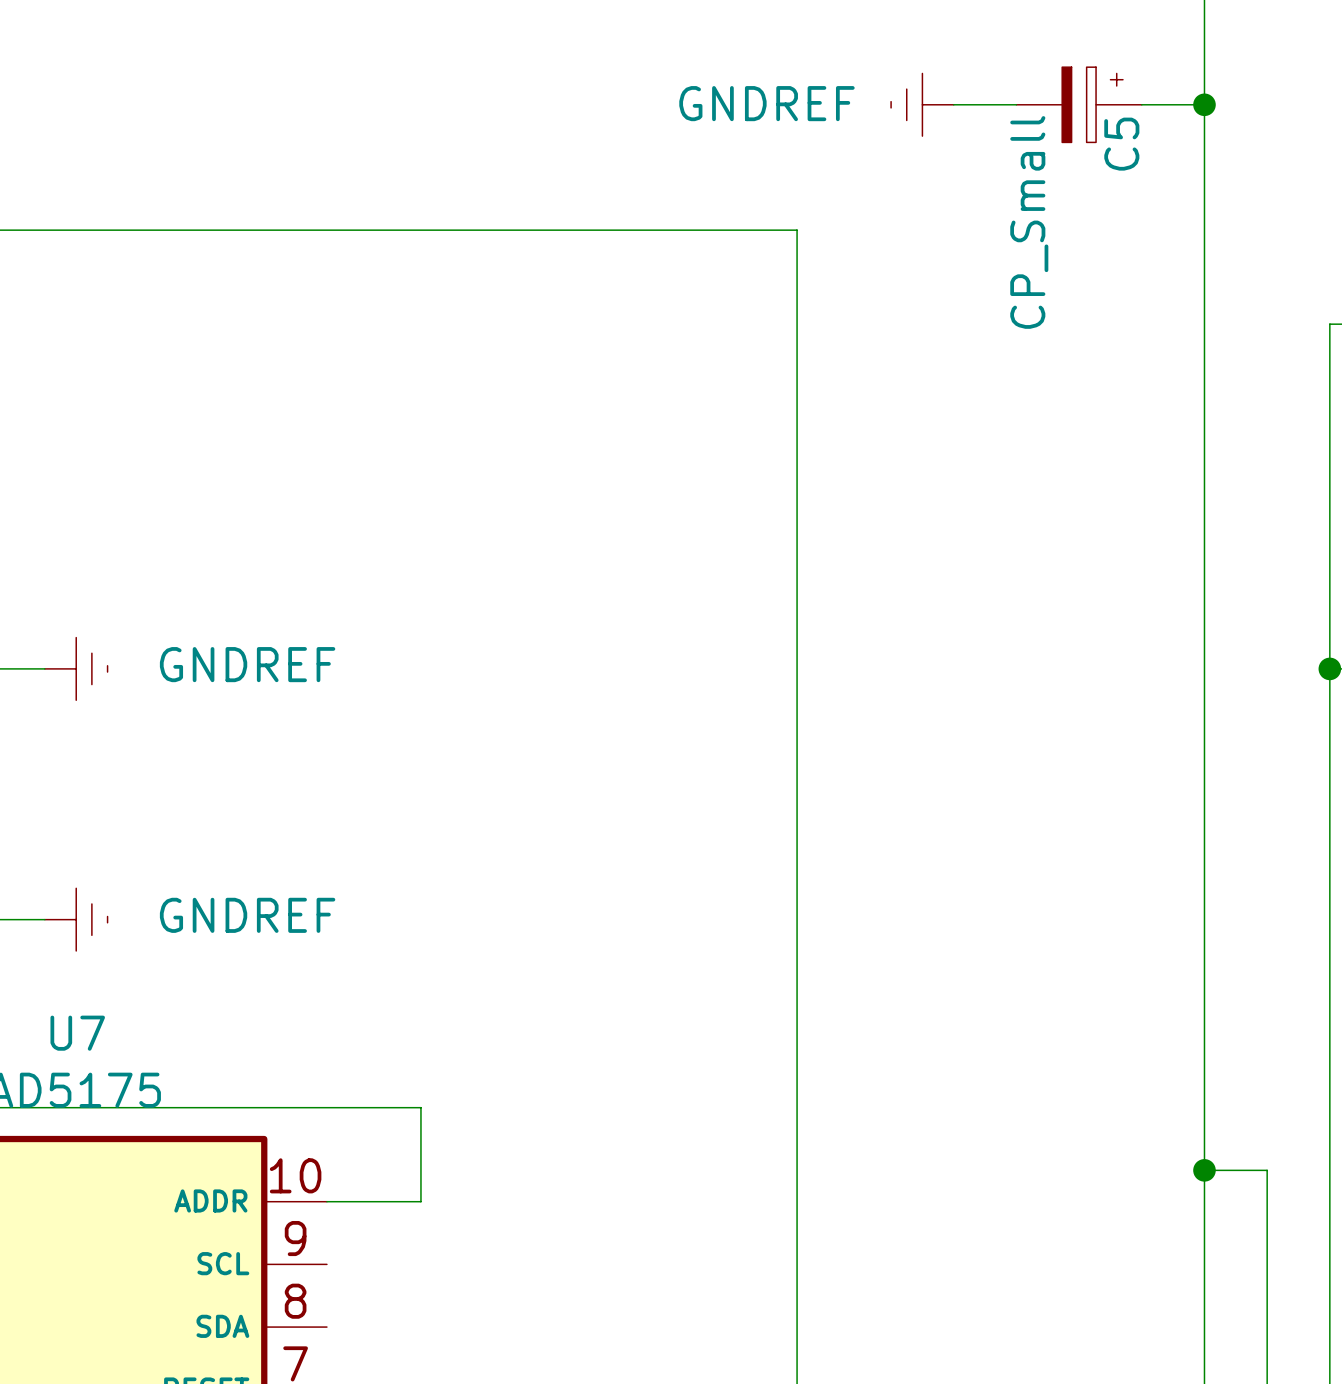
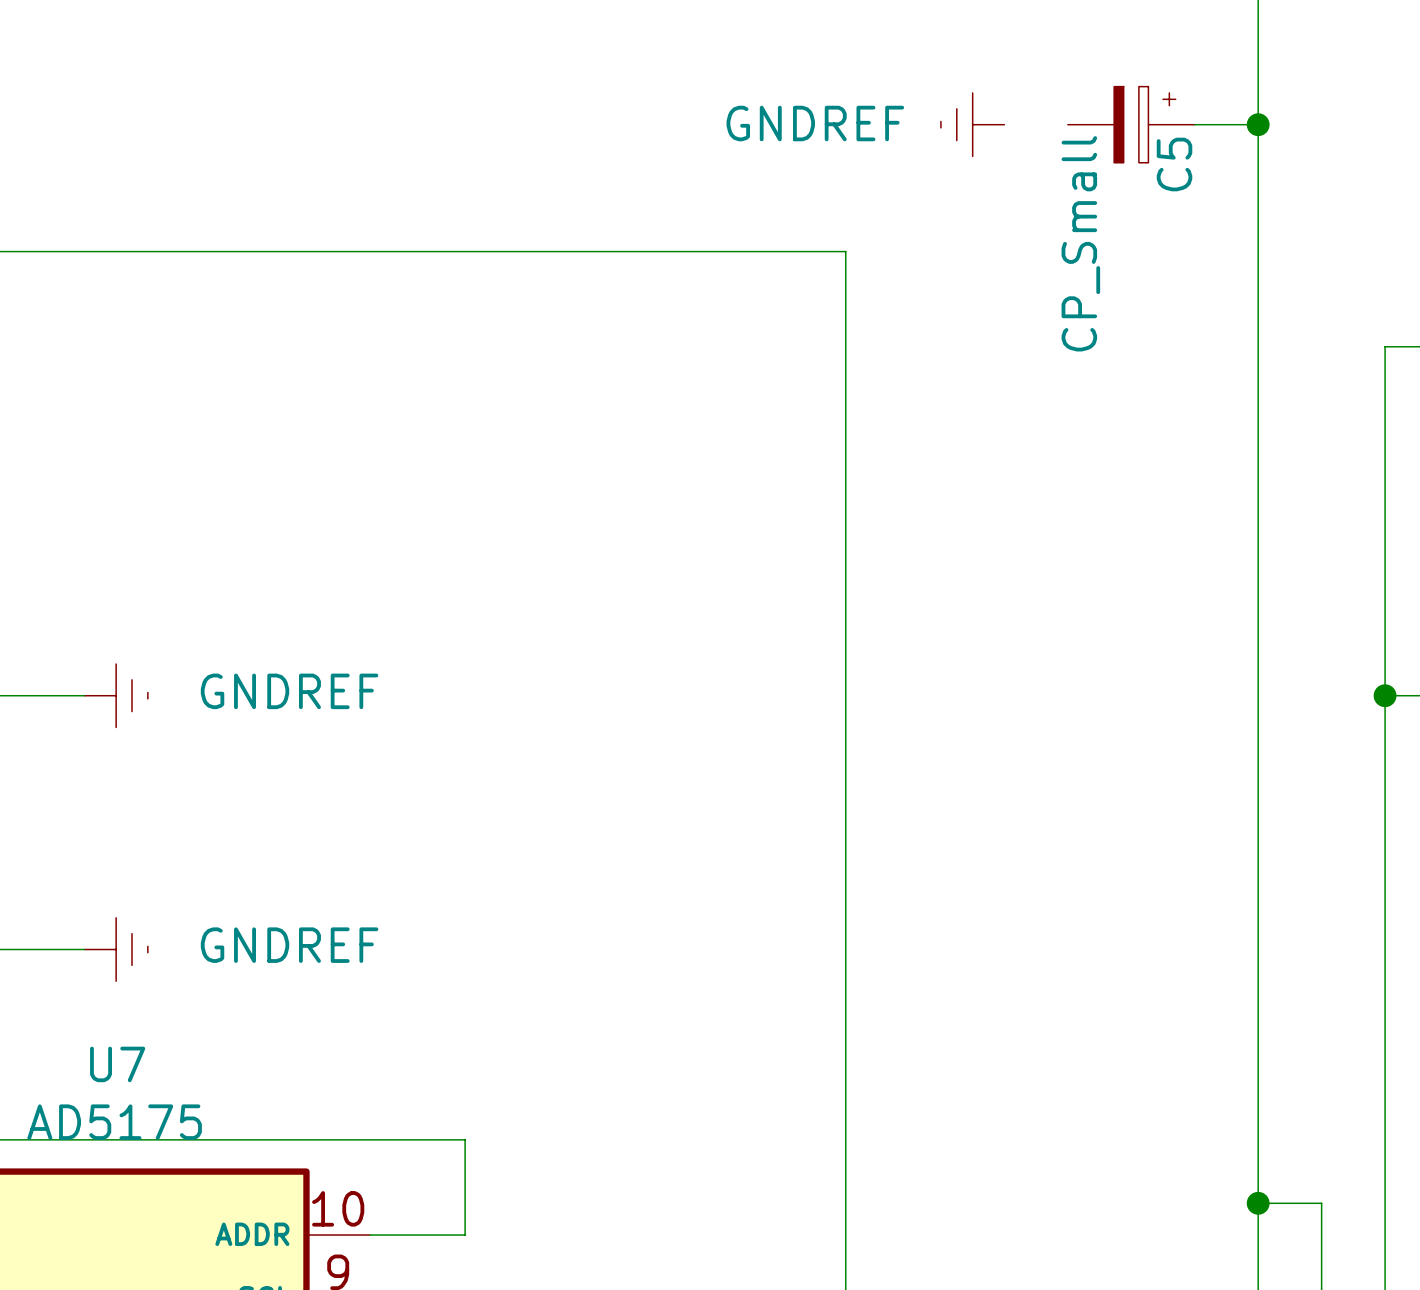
wire: (953, 104) (1016, 104) -> none

